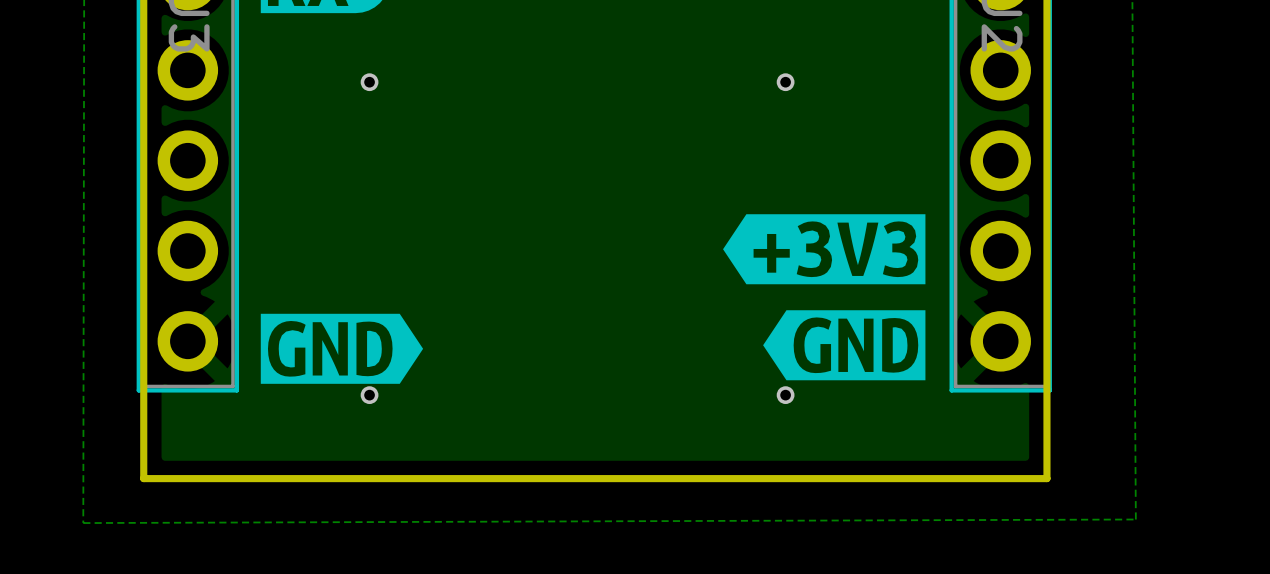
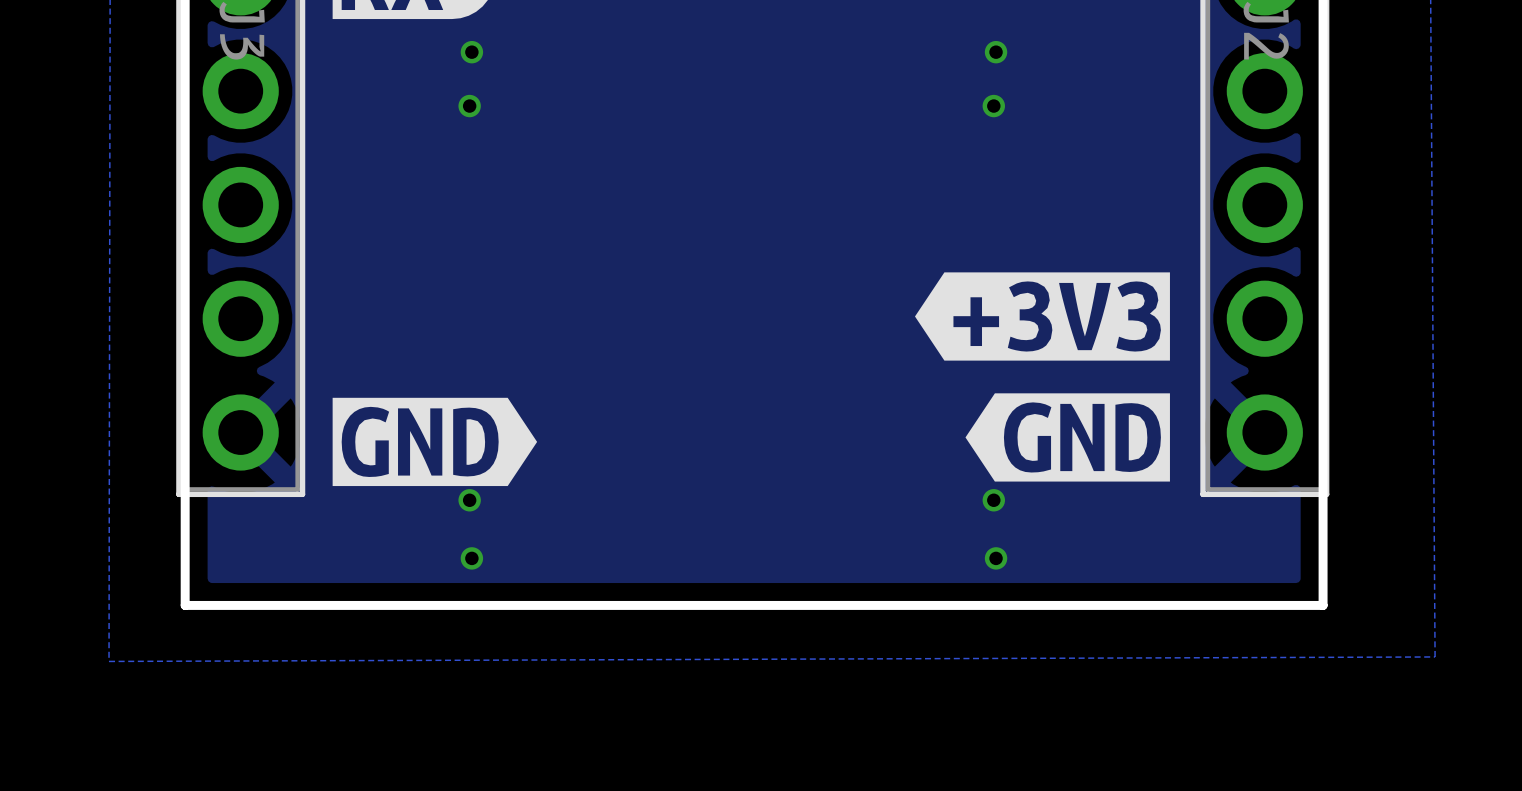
via: none -> (471, 52)
via: none -> (996, 52)
via: none -> (471, 558)
via: none -> (996, 558)

